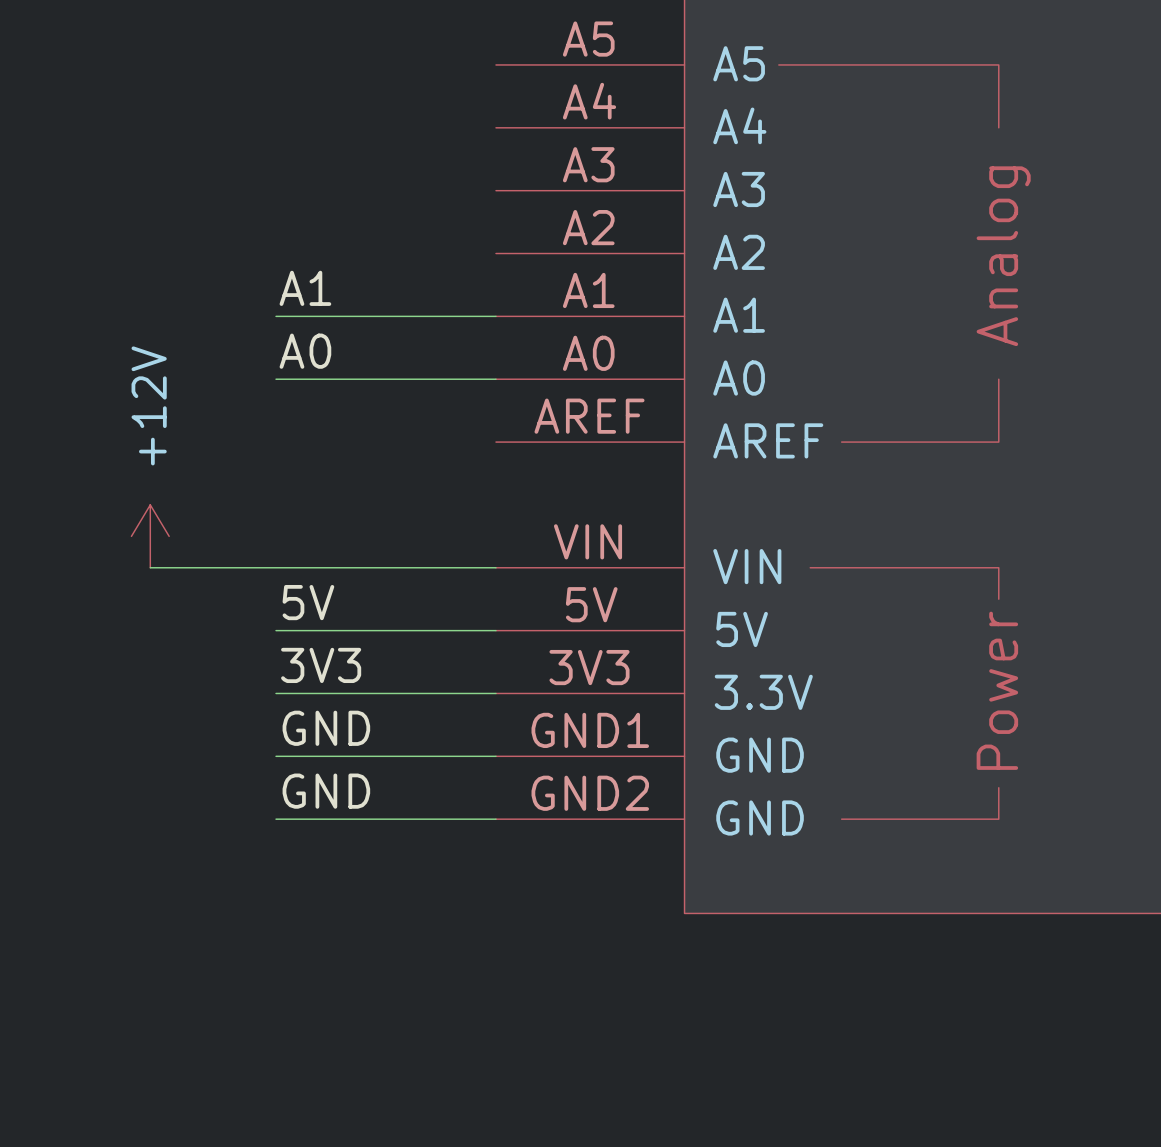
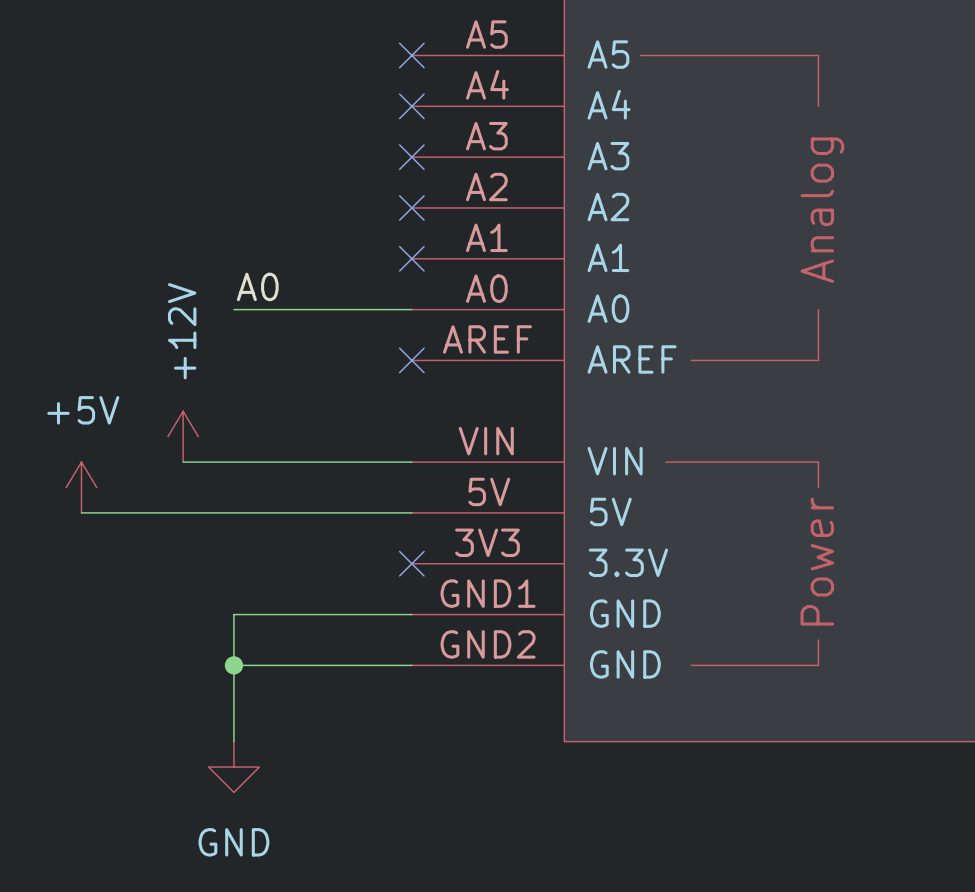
no-connect mark: none -> (411, 55)
no-connect mark: none -> (411, 106)
no-connect mark: none -> (411, 157)
no-connect mark: none -> (411, 207)
label: A1 (305, 288) -> none
wire: (276, 316) (495, 316) -> none
no-connect mark: none -> (411, 258)
no-connect mark: none -> (411, 360)
power symbol position: +12V (150, 536) -> +12V (183, 436)
wire: (150, 567) (213, 567) -> none
power symbol: none -> +5V (81, 487)
label: 5V (308, 602) -> none
wire: none -> (81, 512) (233, 512)
label: 3V3 (321, 665) -> none
wire: (276, 693) (495, 693) -> none
no-connect mark: none -> (411, 563)
label: GND (326, 728) -> none
wire: none -> (233, 614) (233, 741)
label: GND (326, 791) -> none
junction: none -> (233, 665)
power symbol: none -> GND (233, 767)

